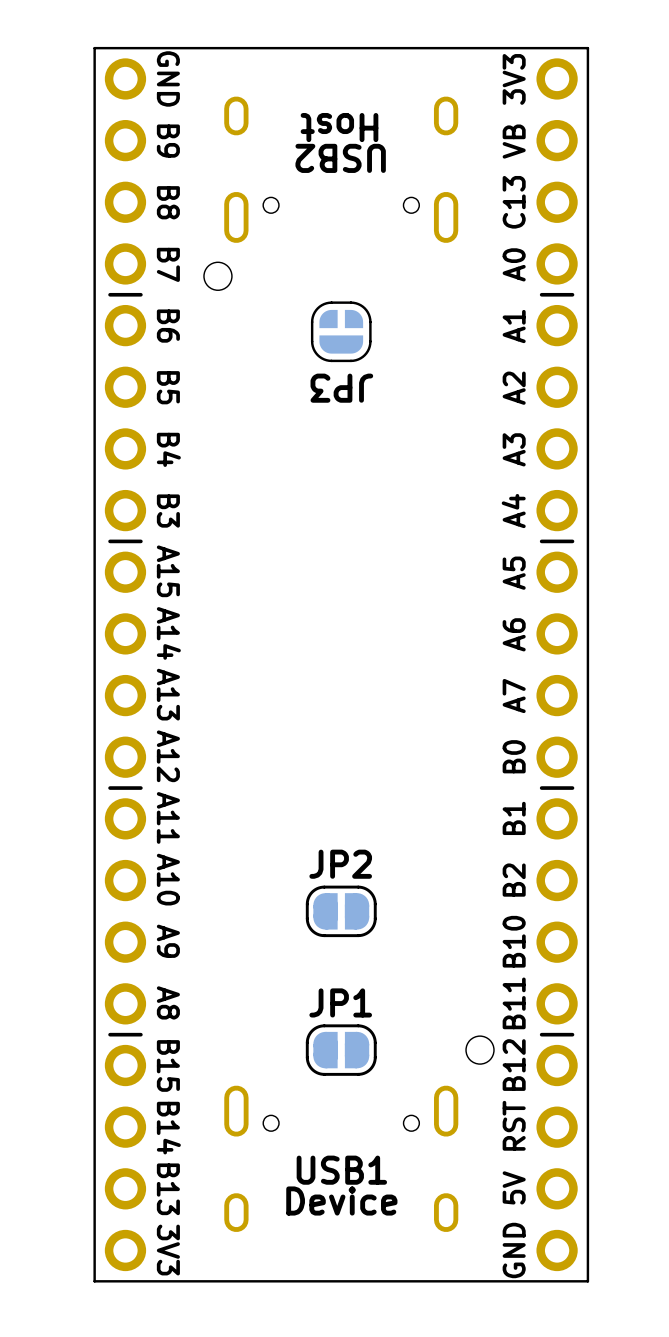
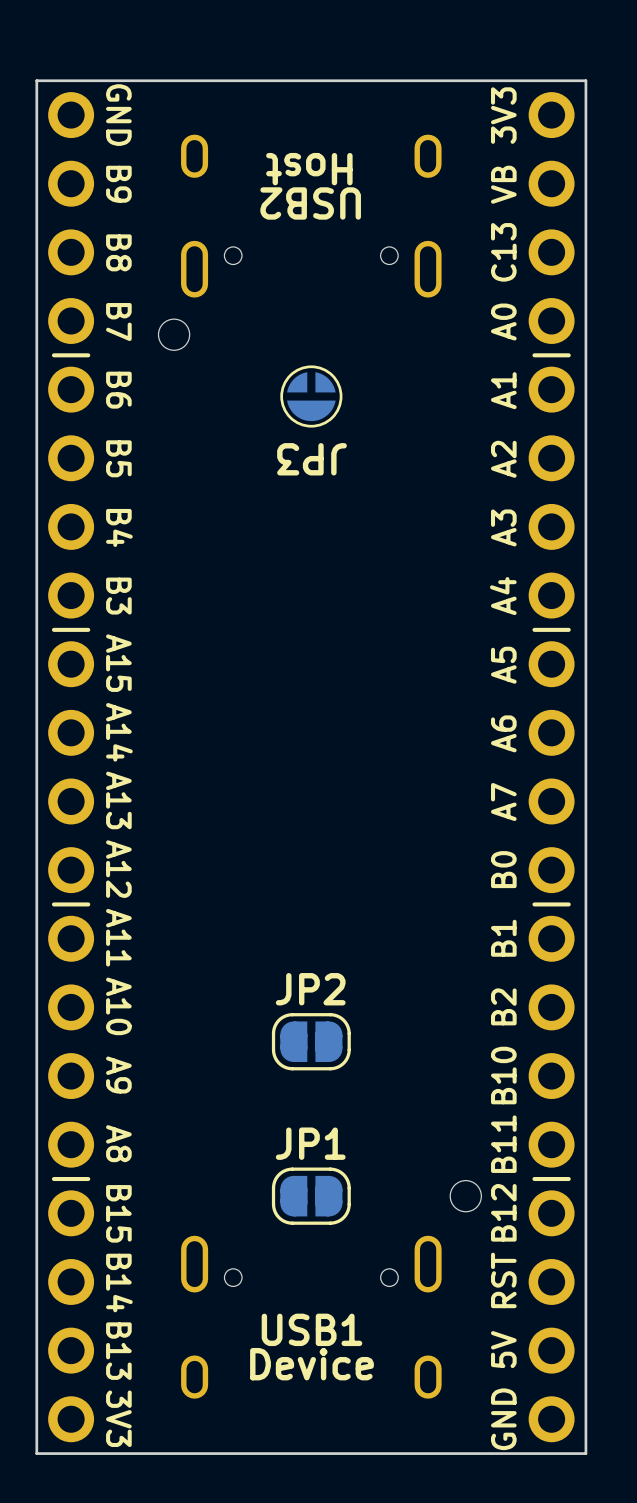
JP3 footprint: [310, 301, 372, 363] -> [280, 365, 343, 428]

